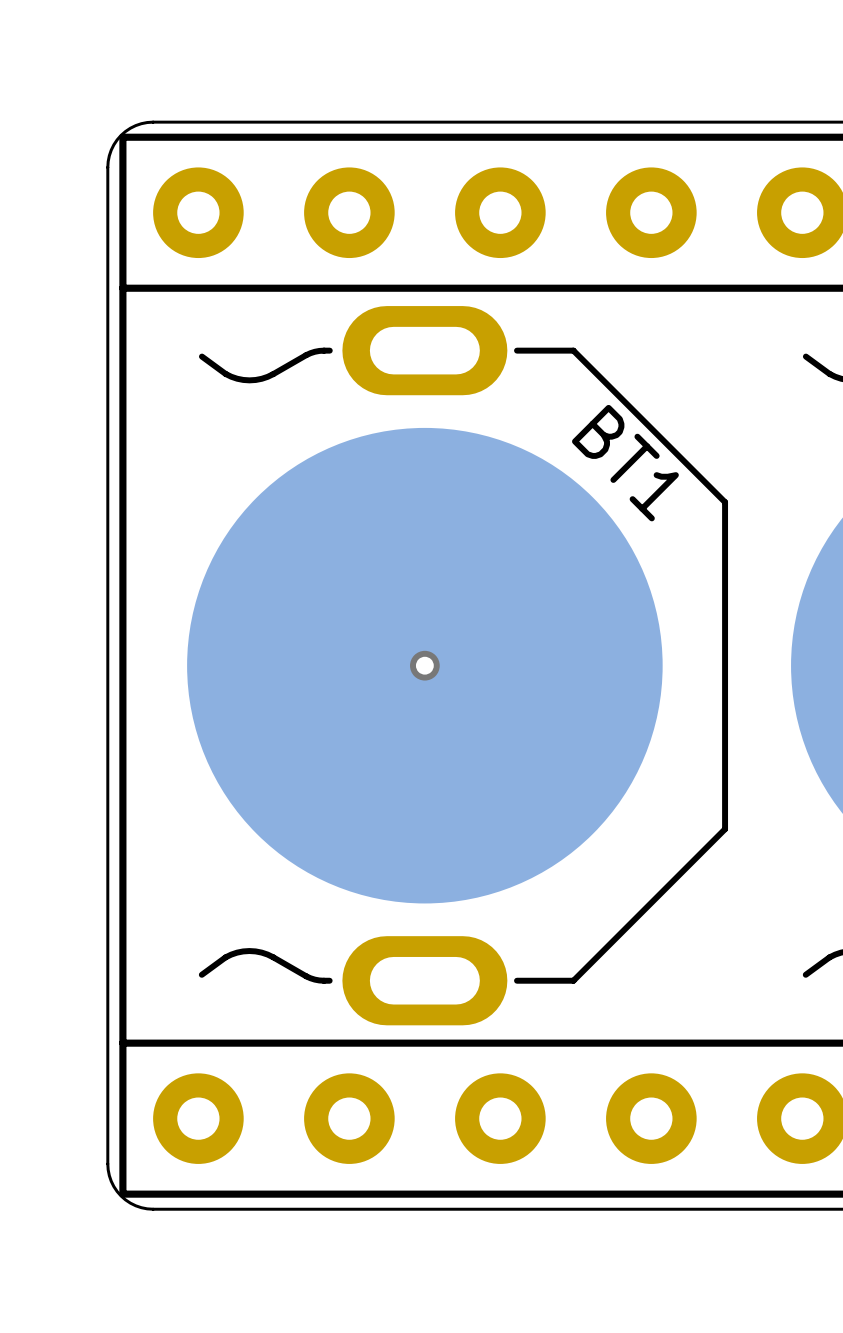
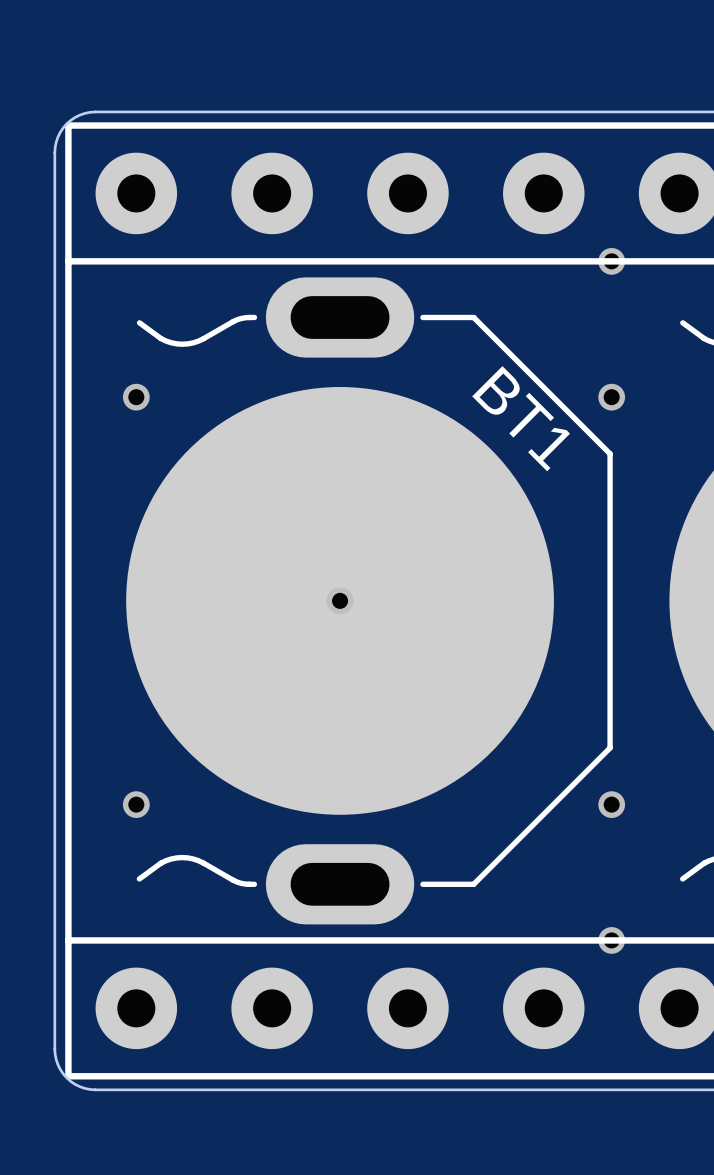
via: none -> (611, 261)
via: none -> (136, 397)
via: none -> (611, 397)
via: none -> (136, 804)
via: none -> (611, 804)
via: none -> (611, 940)

